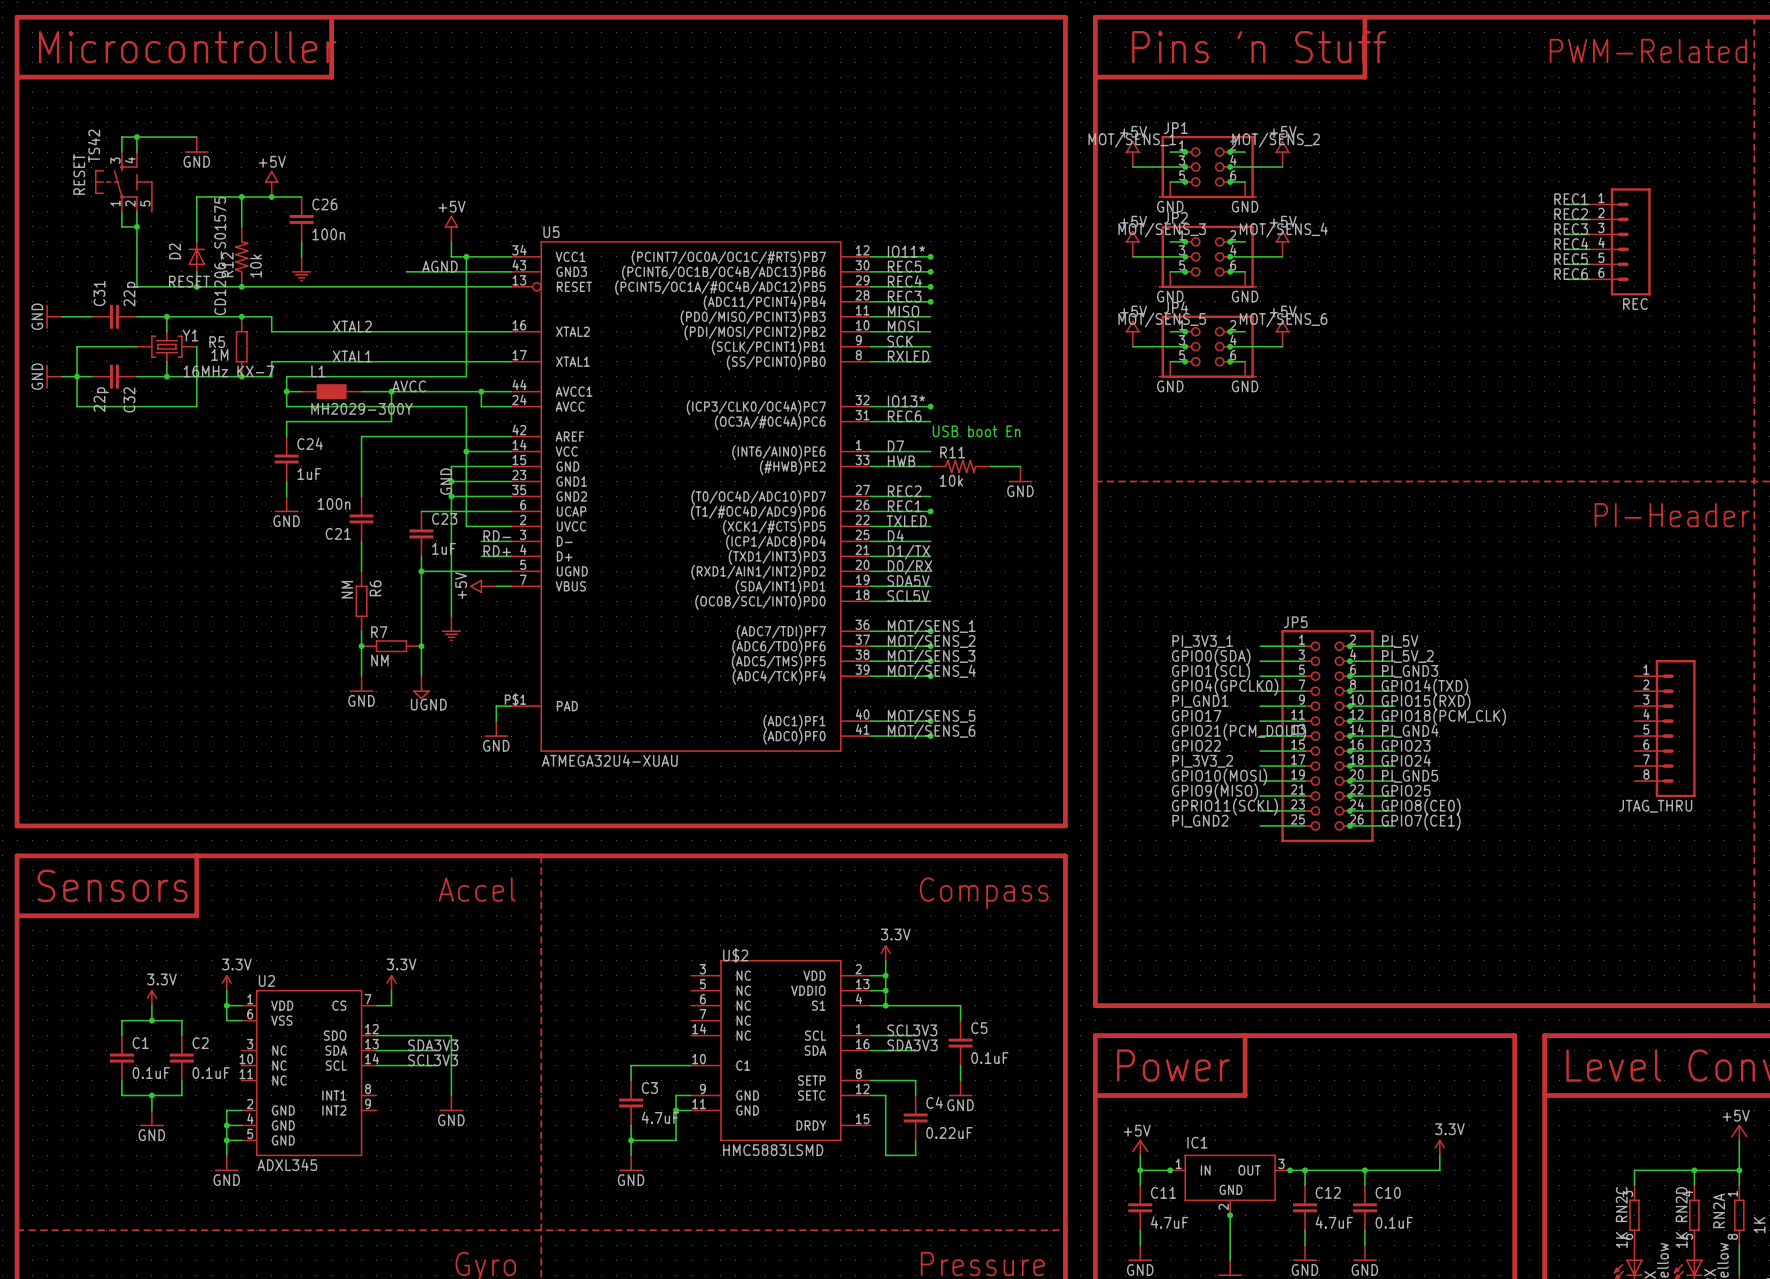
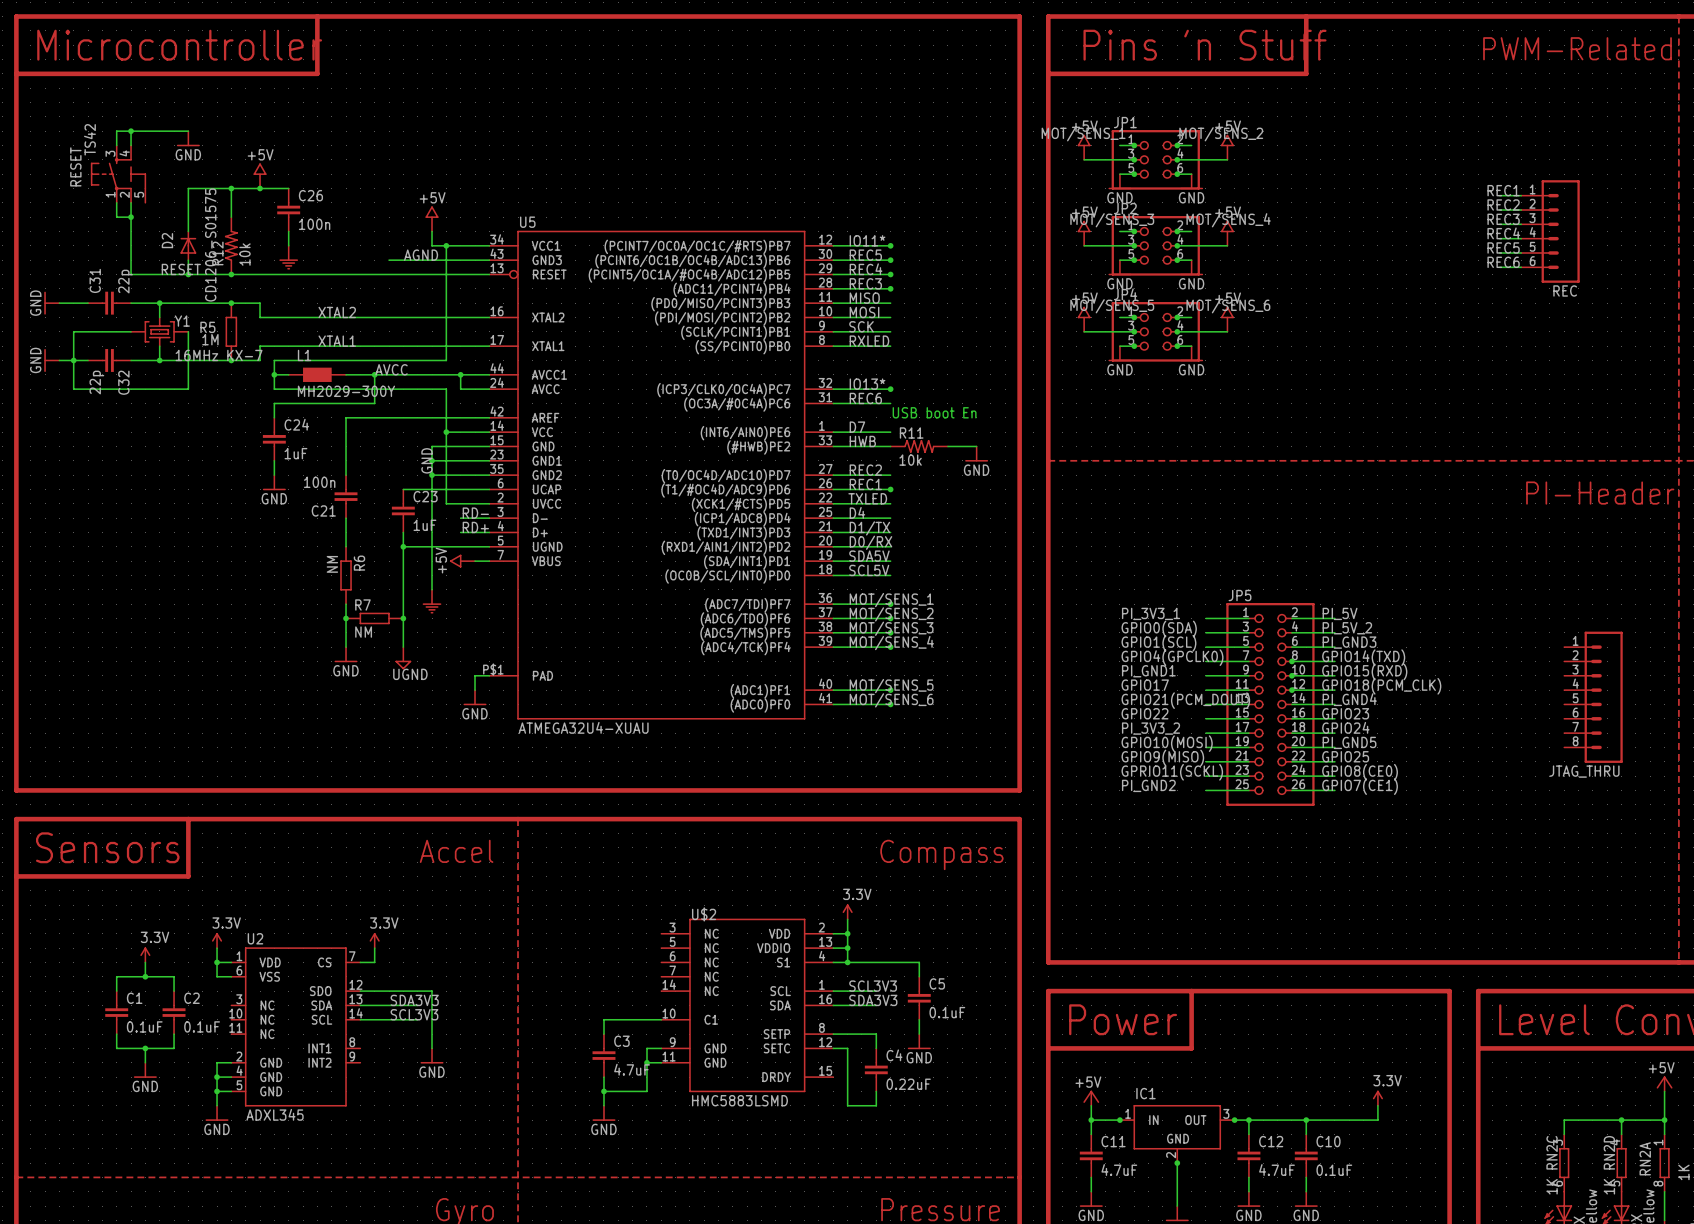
junction: (1349, 646) -> none
junction: (1349, 661) -> none
junction: (1349, 676) -> none
junction: (1349, 736) -> none
junction: (1349, 751) -> none
junction: (1349, 766) -> none
junction: (1349, 781) -> none
junction: (1349, 795) -> none
junction: (1349, 810) -> none
junction: (1349, 825) -> none

